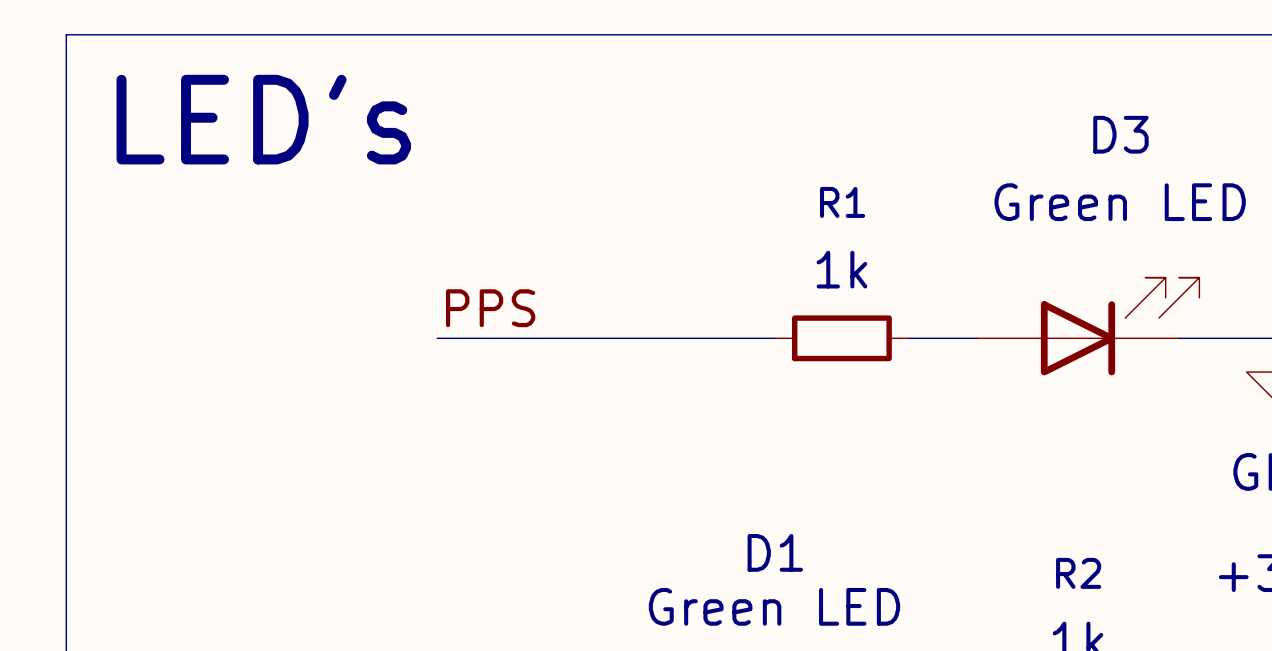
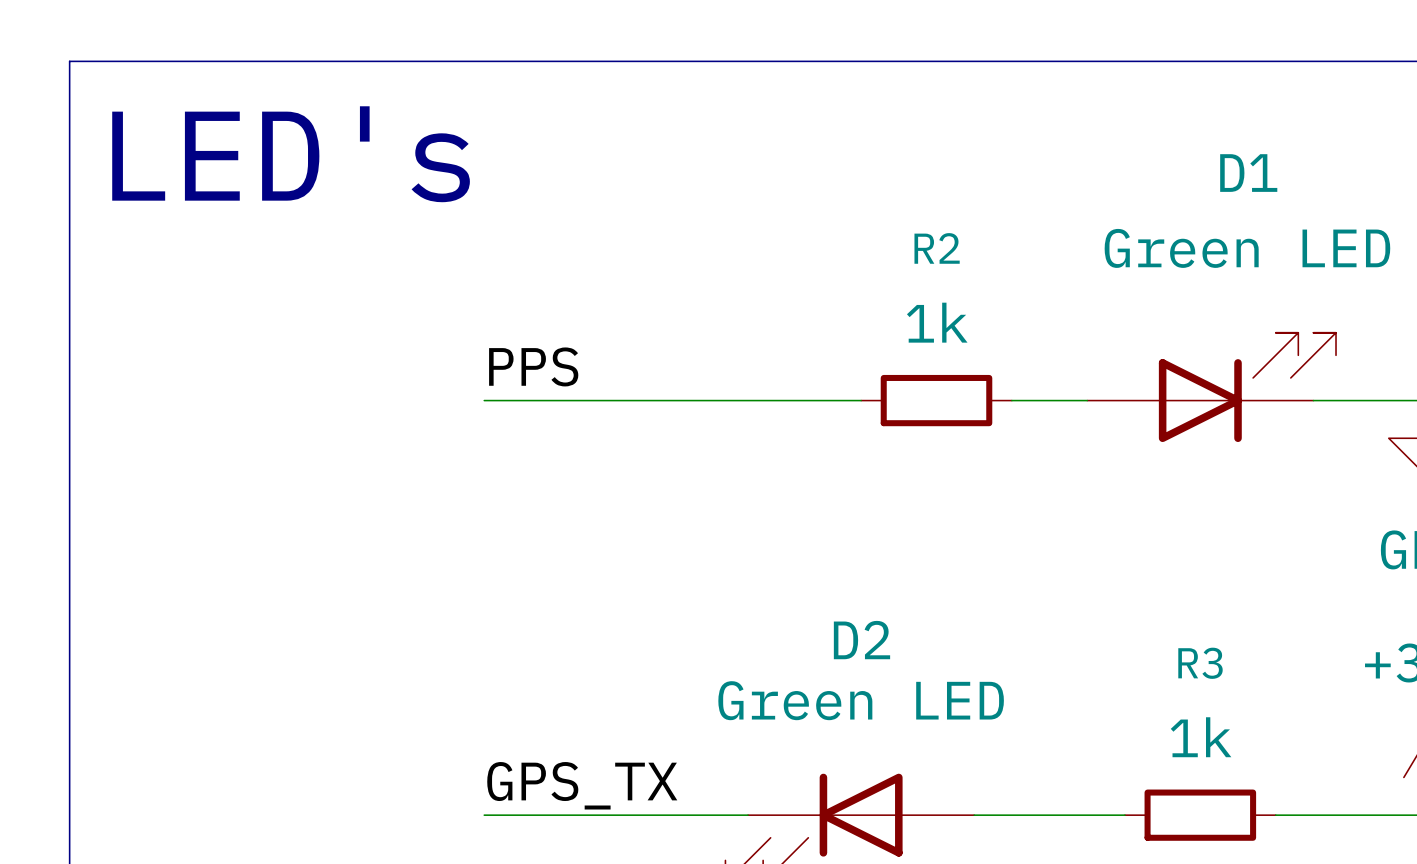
D3 name: D3 (1120, 134) -> D1 (1248, 173)
R1 name: R1 (842, 202) -> R2 (937, 248)
D1 name: D1 (775, 552) -> D2 (861, 640)
R2 name: R2 (1078, 573) -> R3 (1200, 663)

